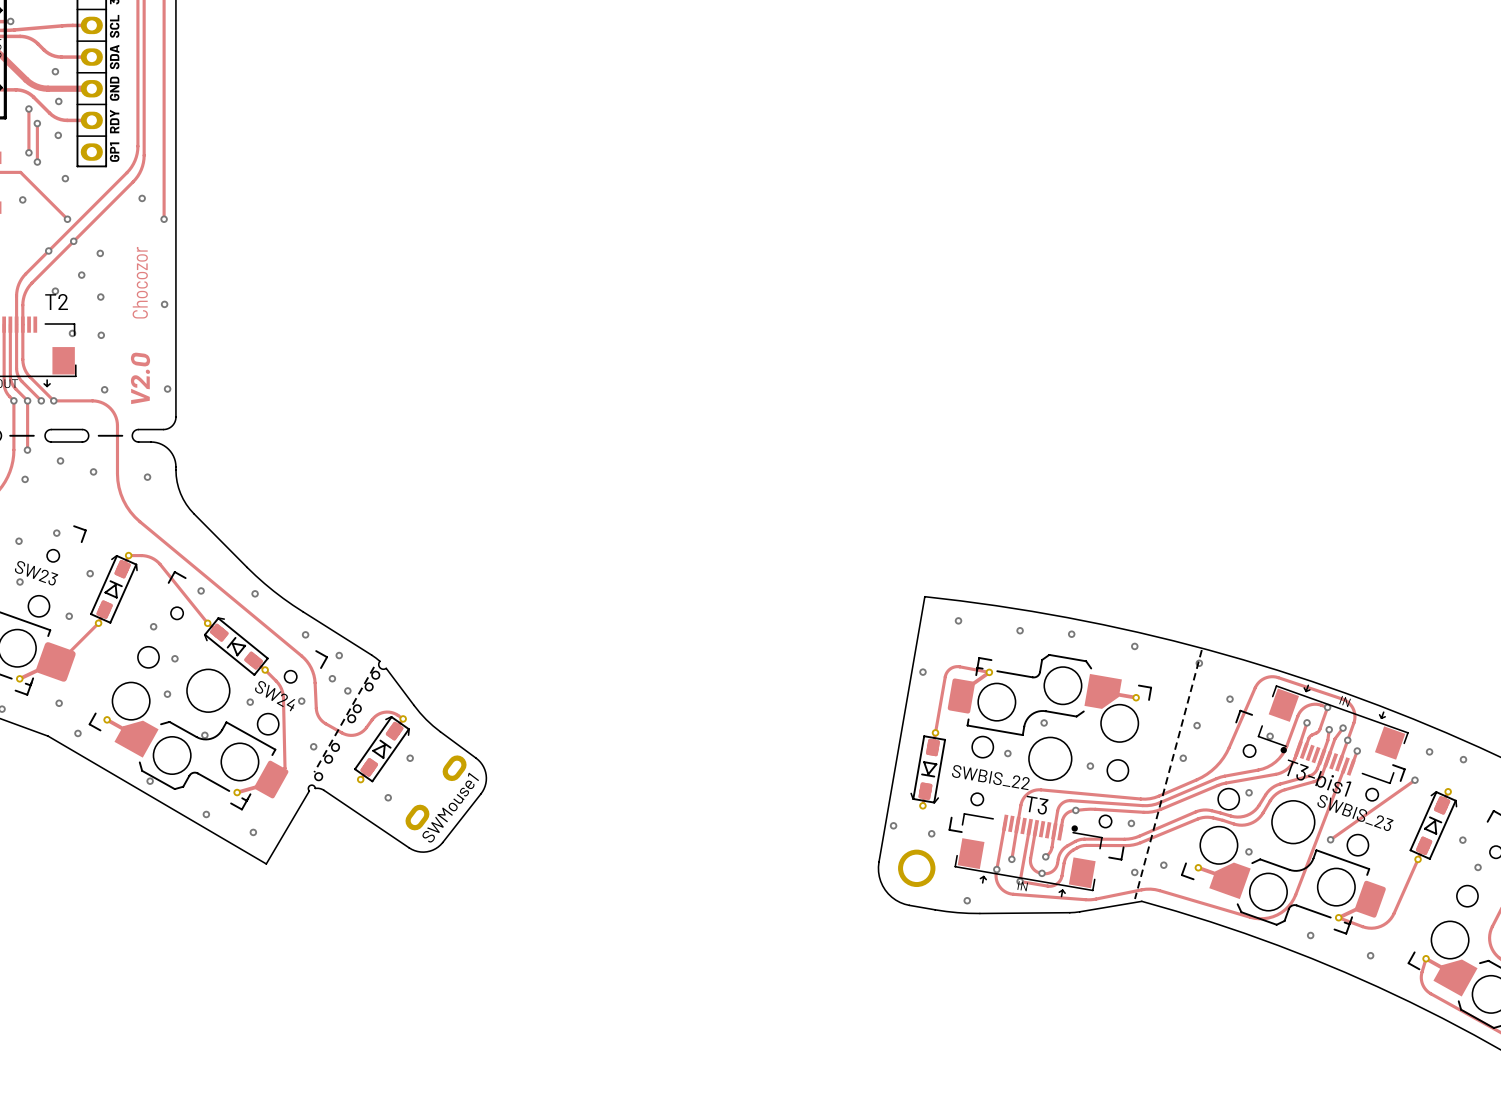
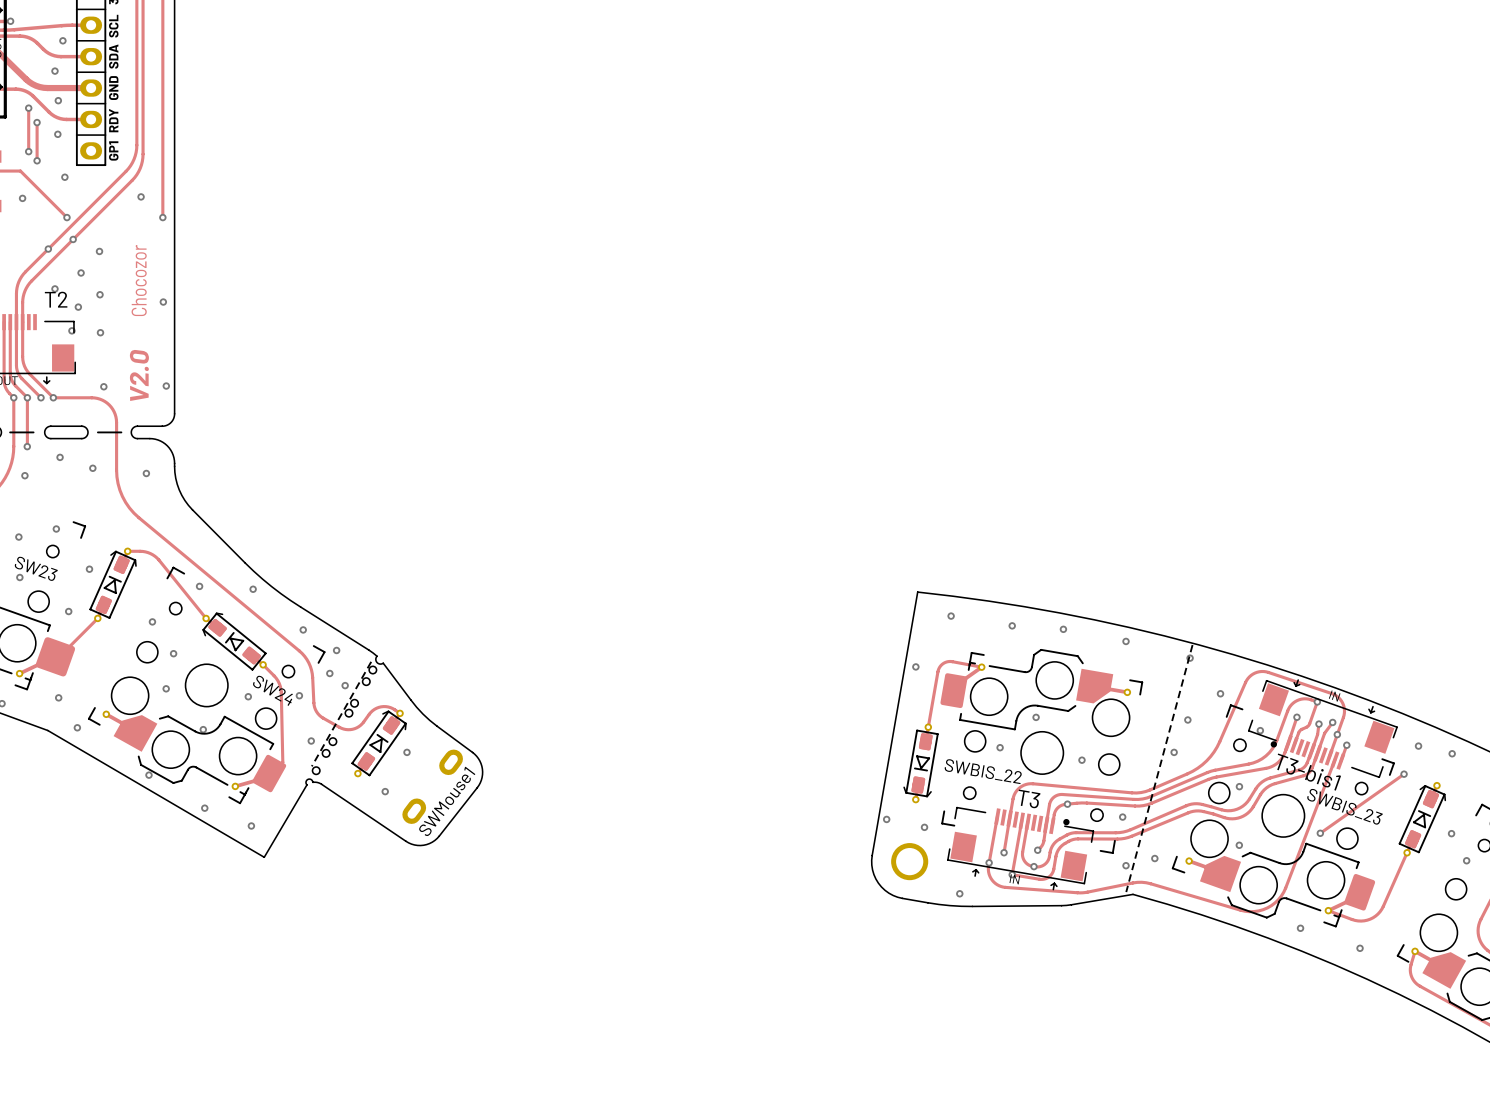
via: none -> (62, 40)
via: none -> (78, 307)

